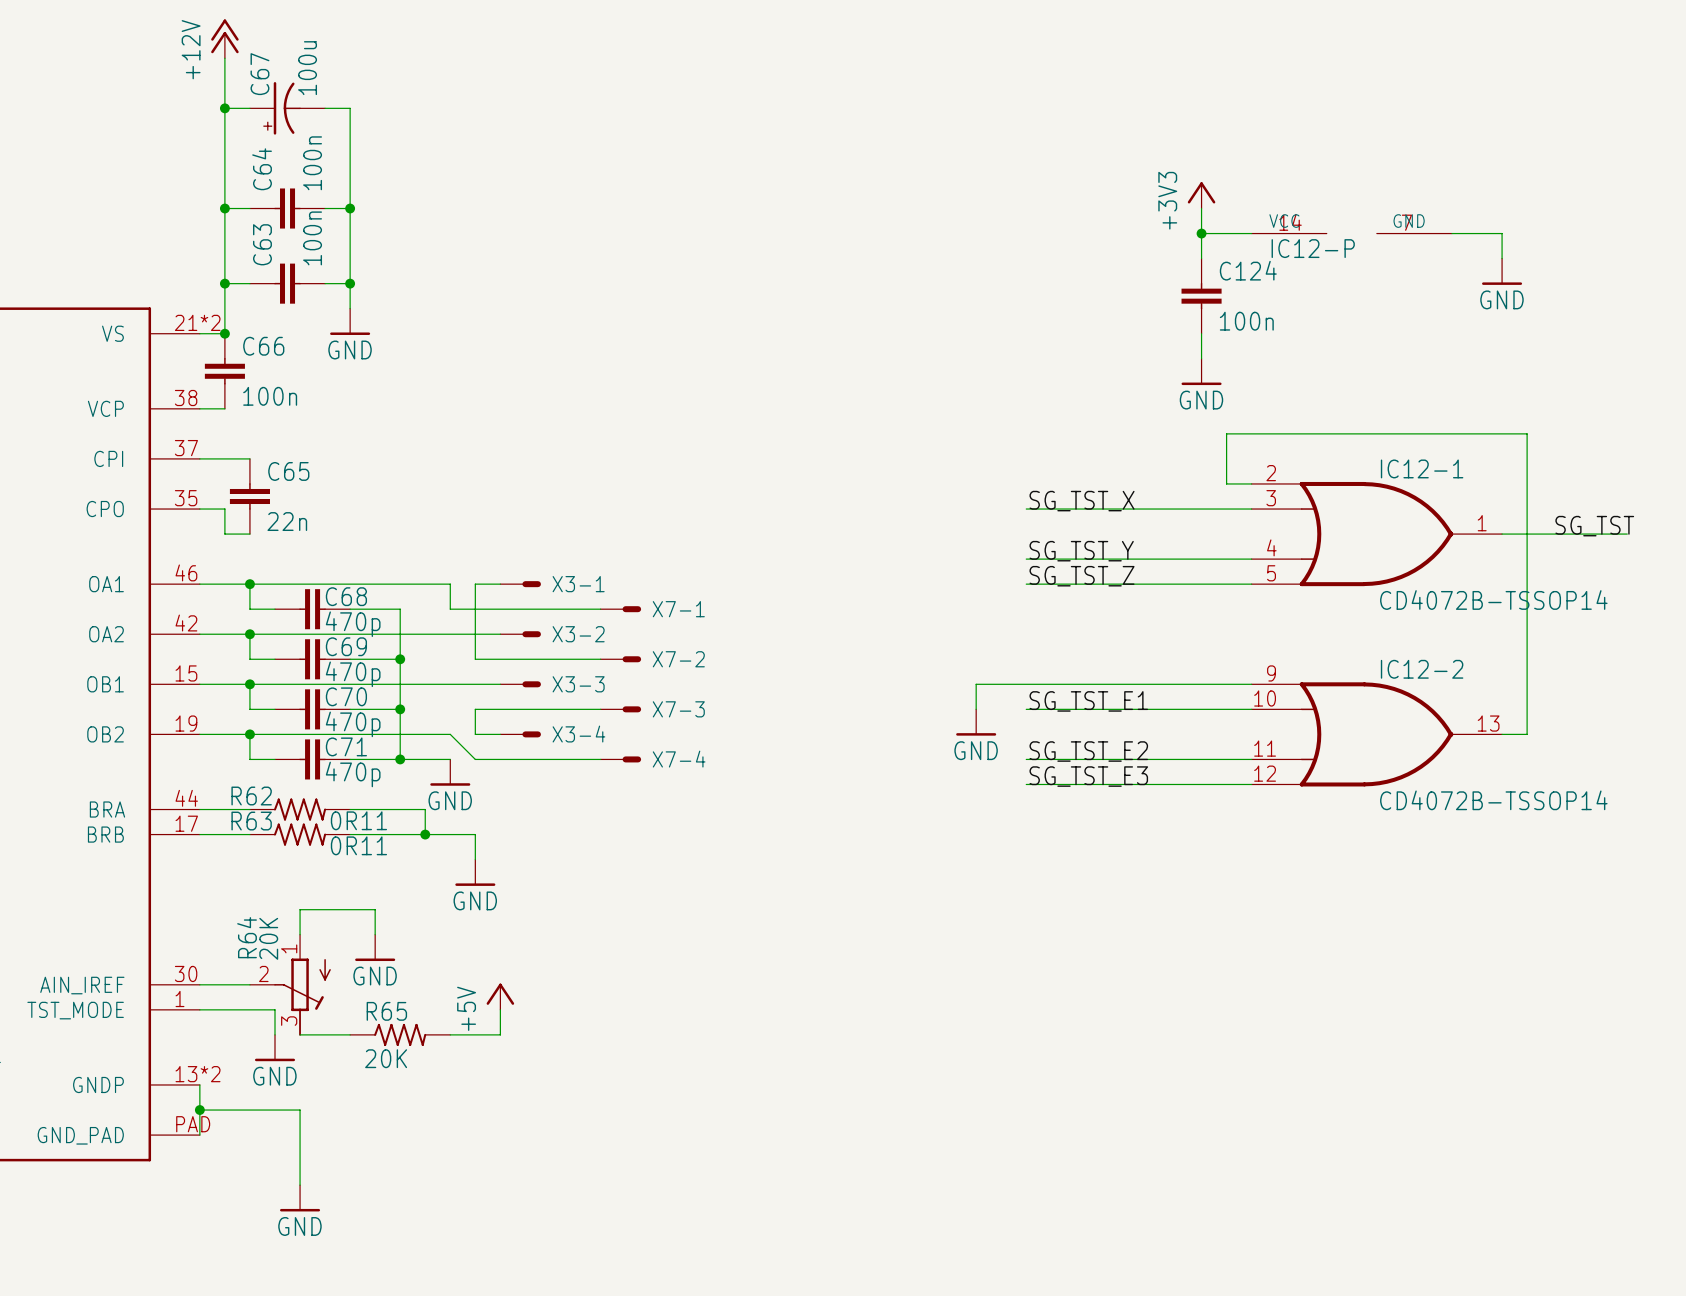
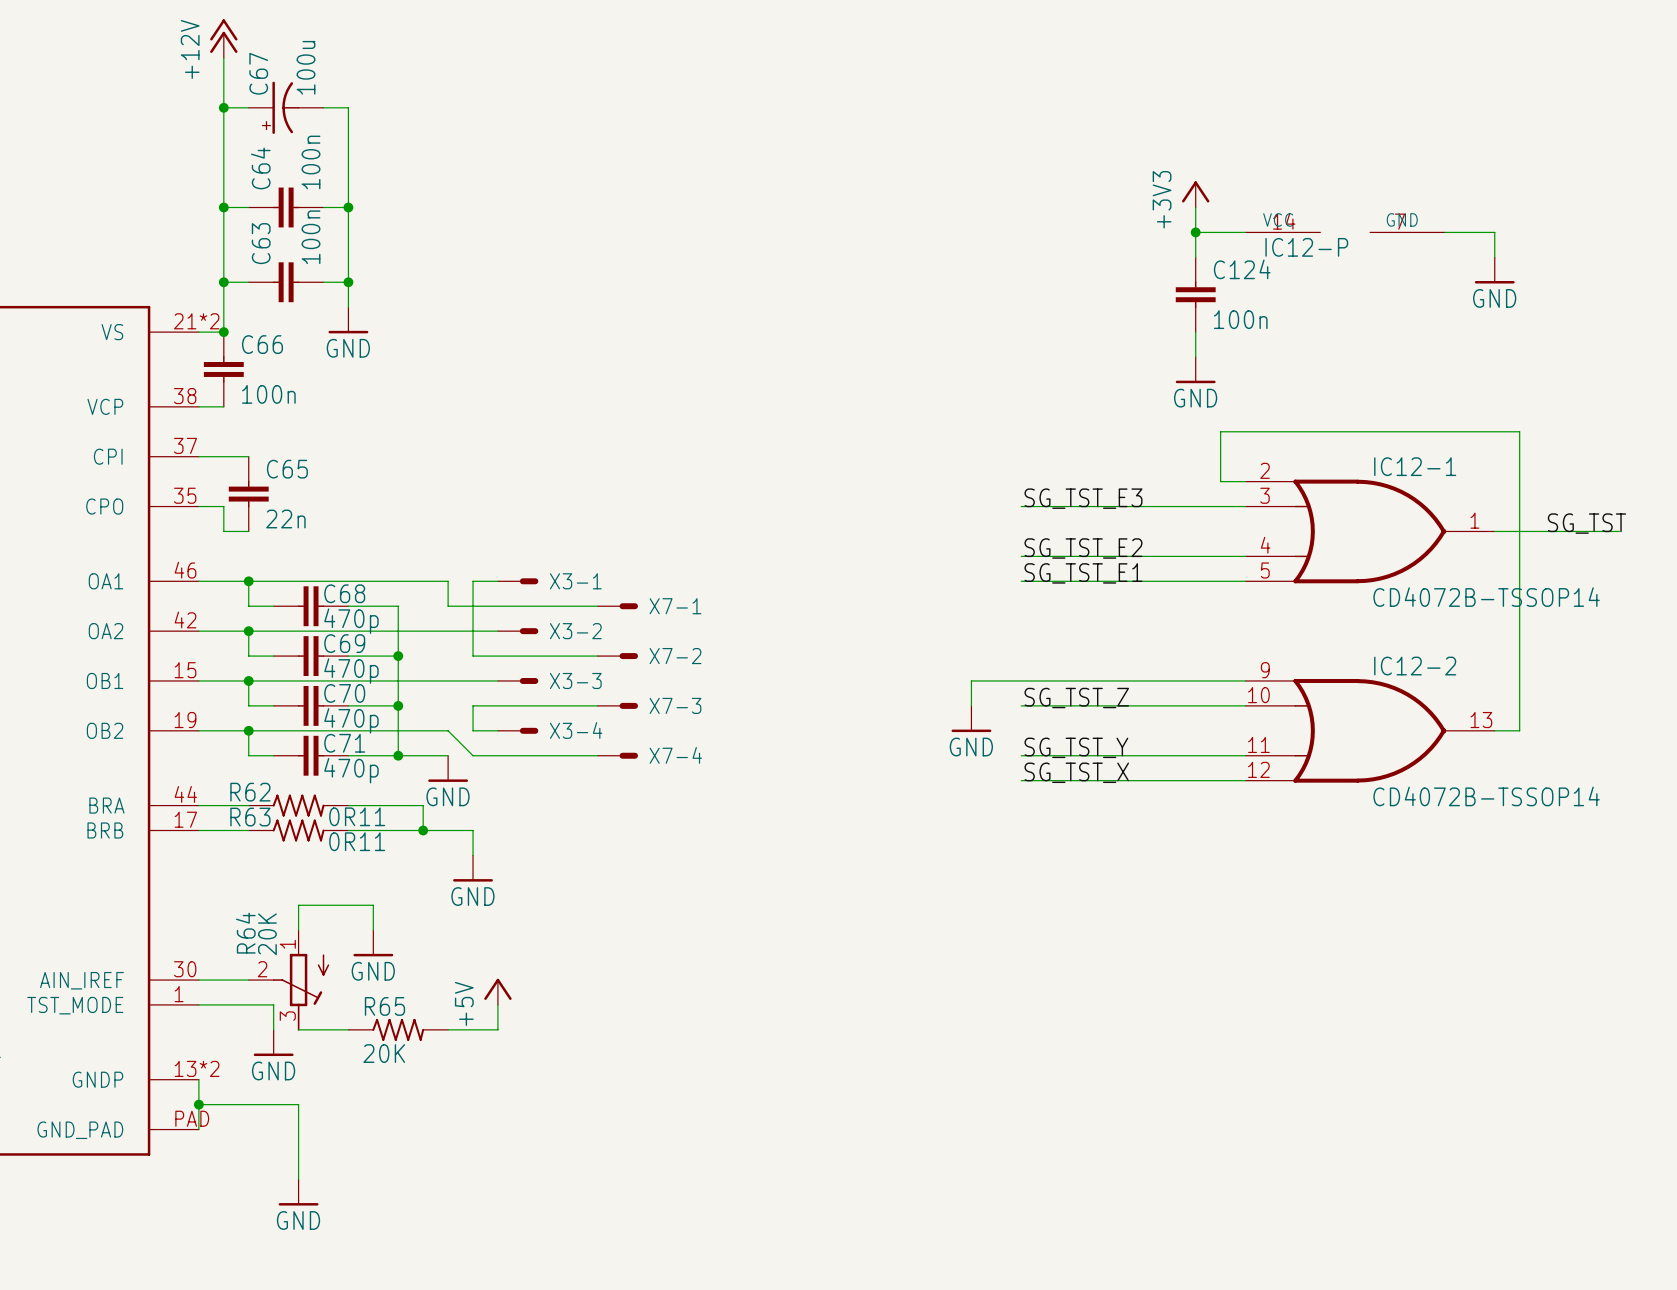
label: SG_TST_X (1082, 501) -> SG_TST_E3 (1083, 498)
label: SG_TST_Y (1081, 551) -> SG_TST_E2 (1083, 548)
label: SG_TST_Z (1082, 576) -> SG_TST_E1 (1083, 573)
label: SG_TST_E1 (1088, 701) -> SG_TST_Z (1076, 698)
label: SG_TST_E2 (1088, 751) -> SG_TST_Y (1076, 747)
label: SG_TST_E3 (1088, 776) -> SG_TST_X (1076, 772)

